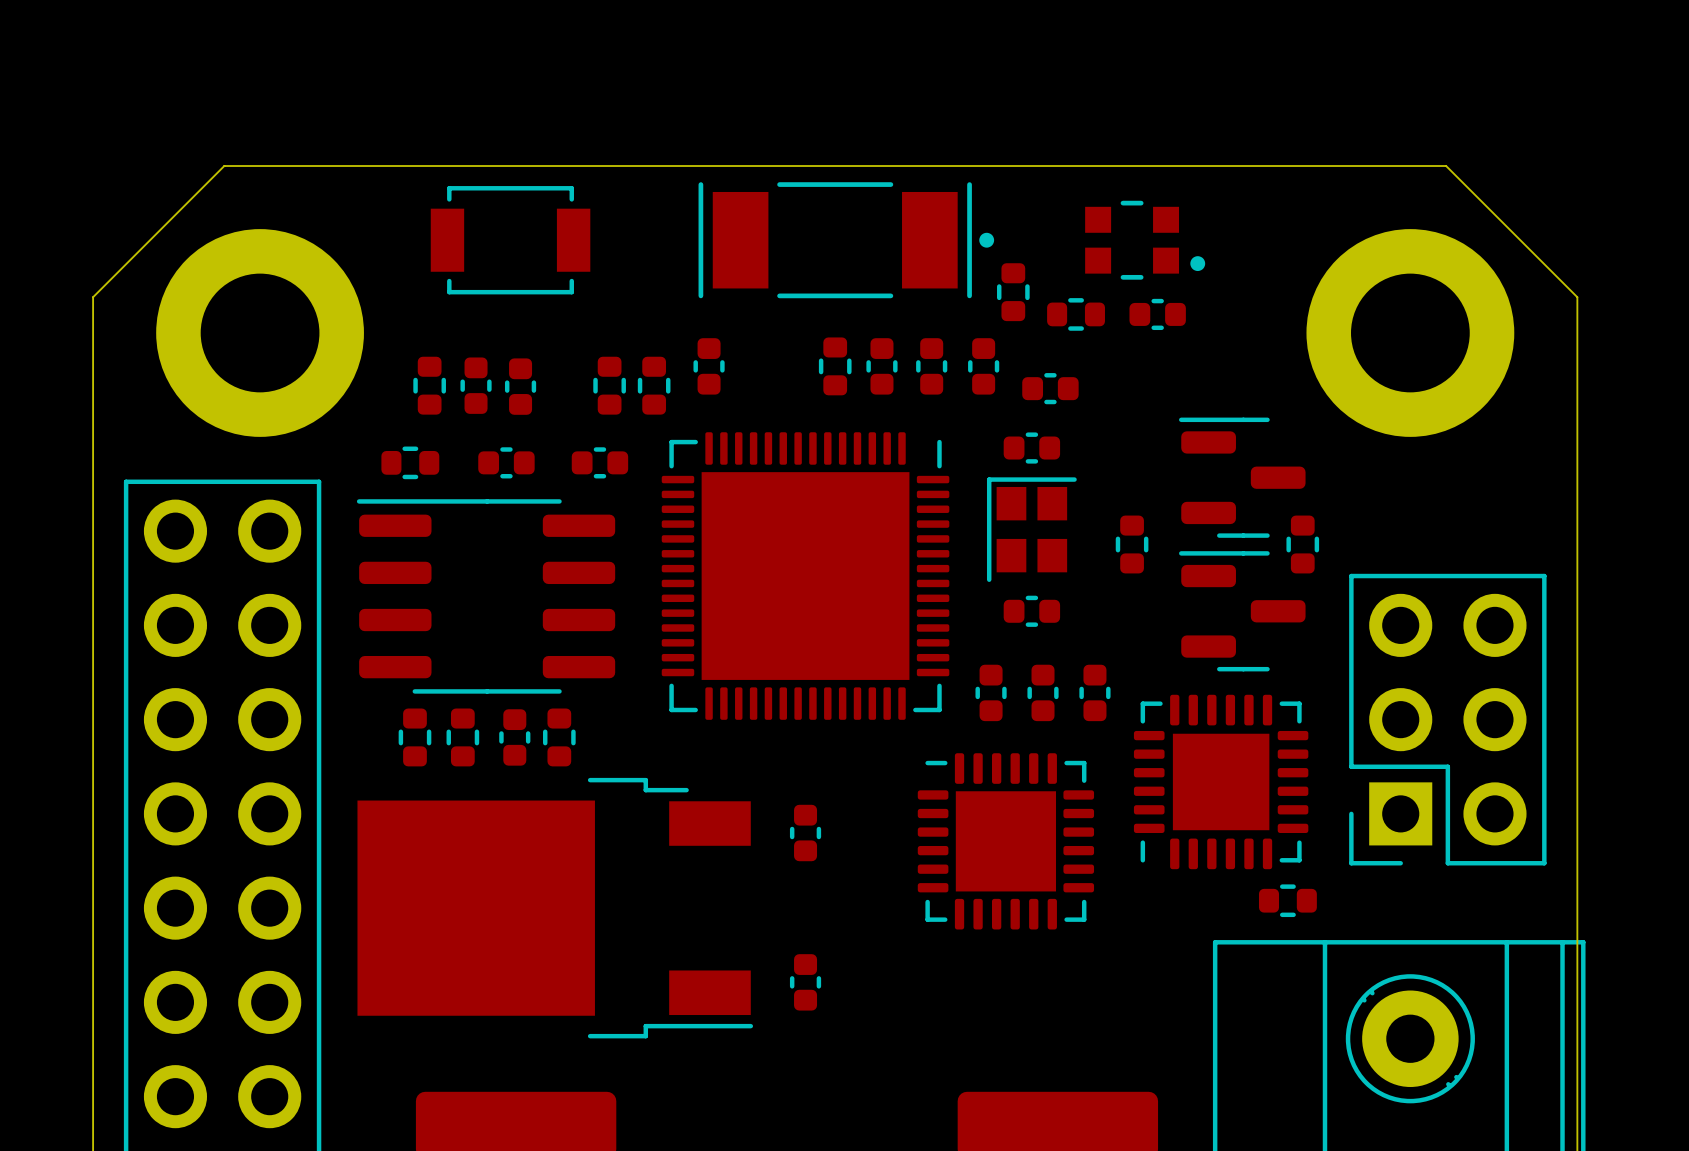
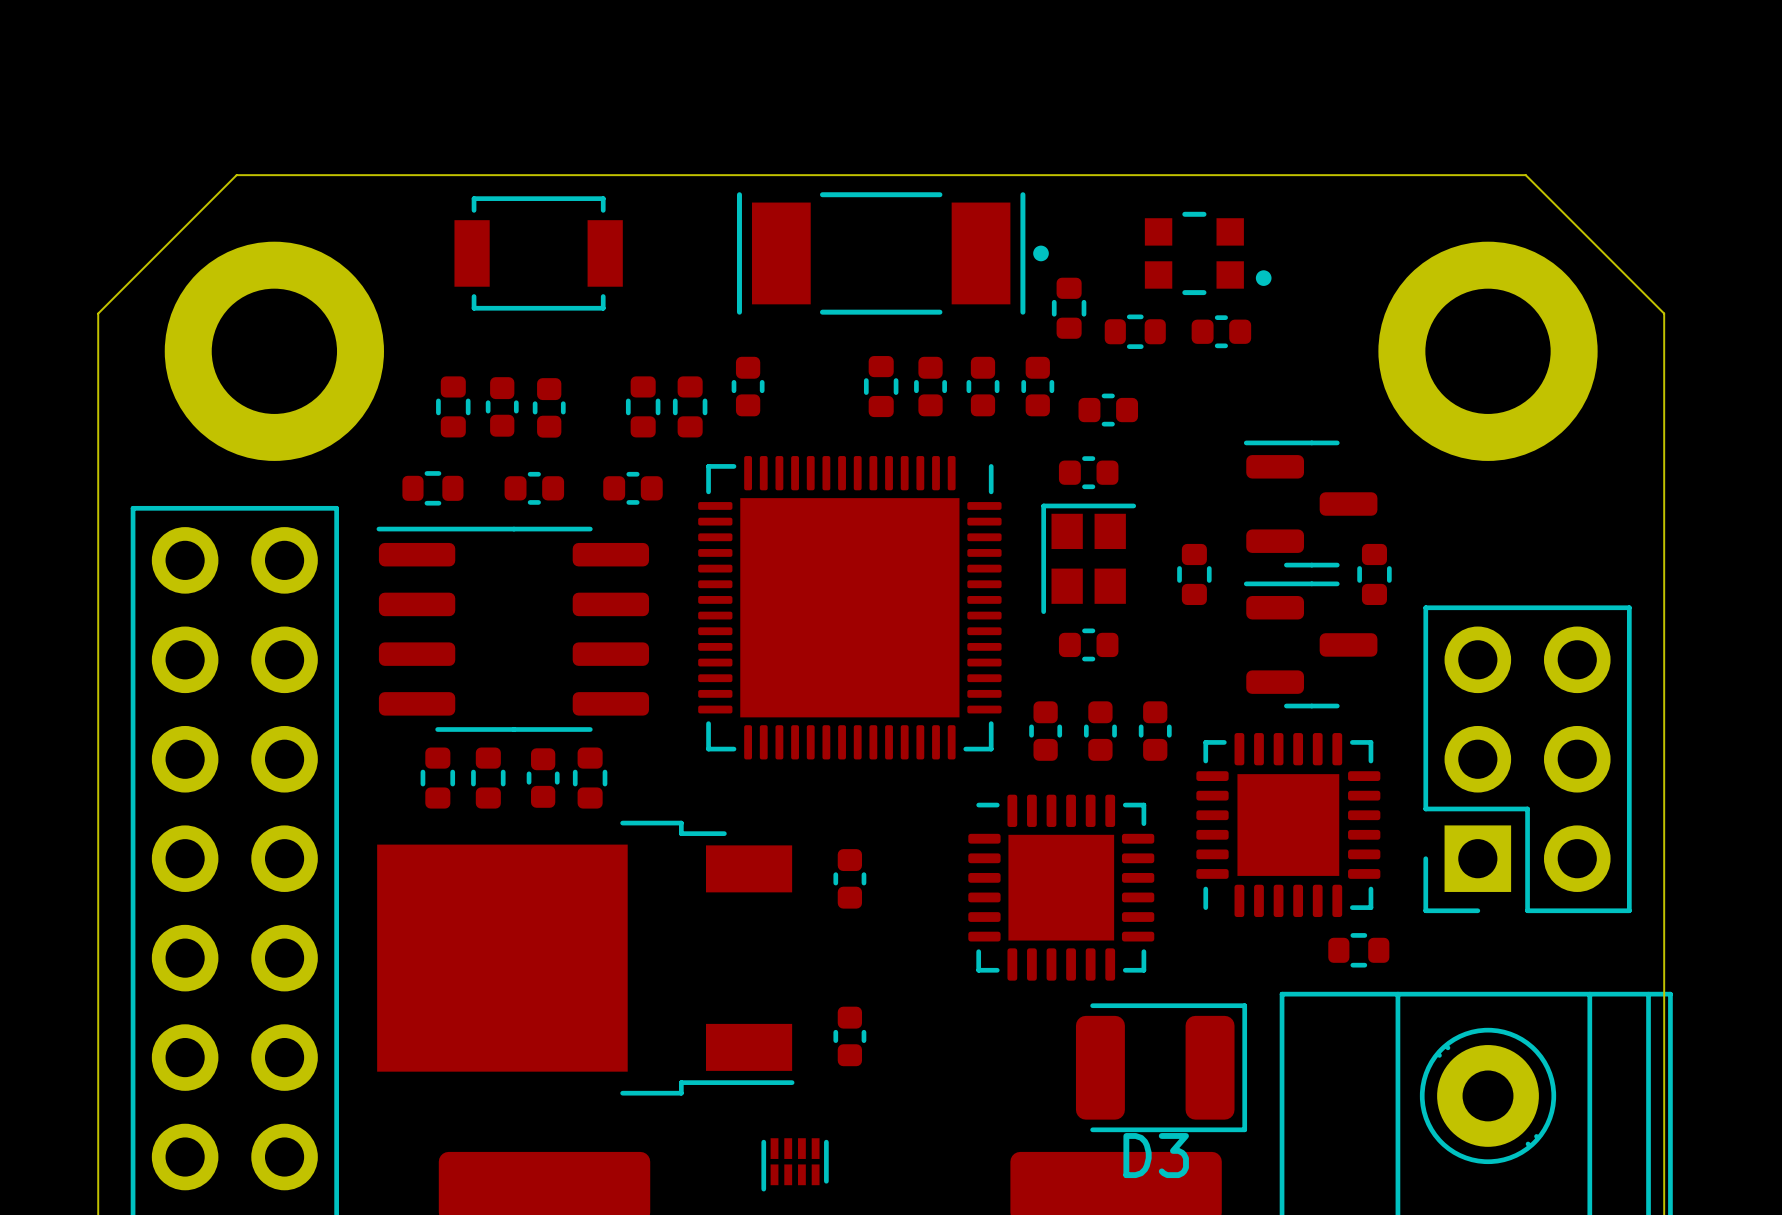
D3: none -> (1161, 1067)
part: none -> (795, 1164)

